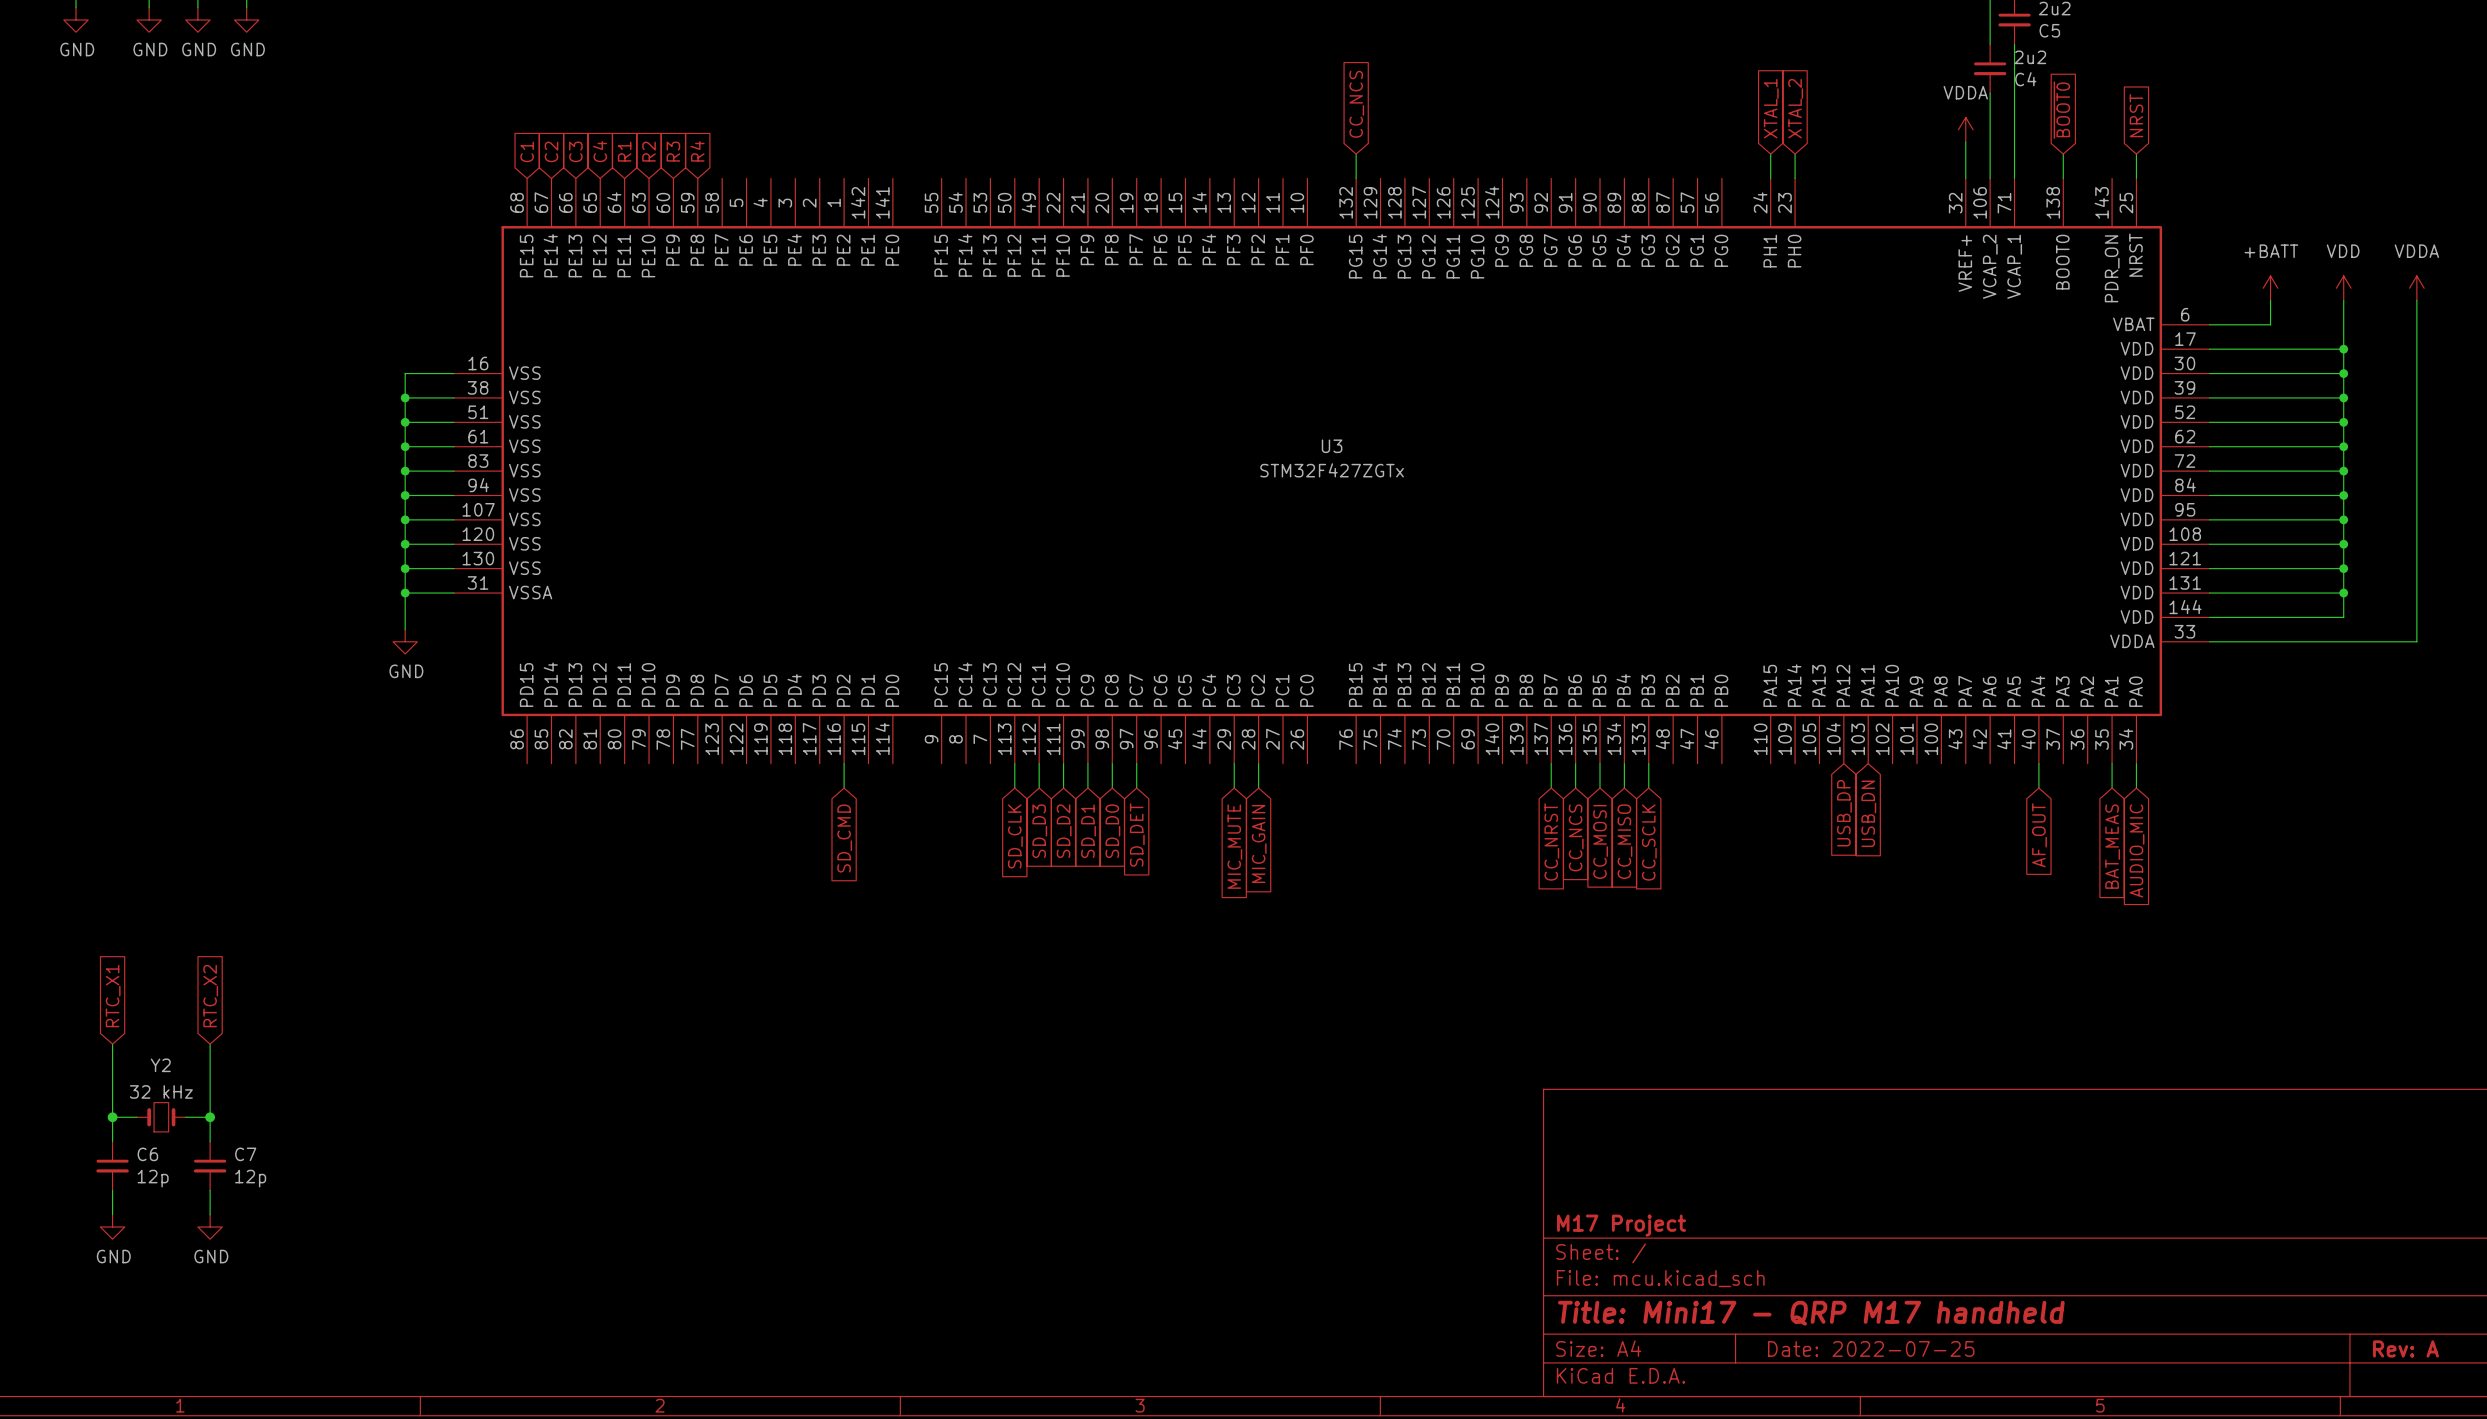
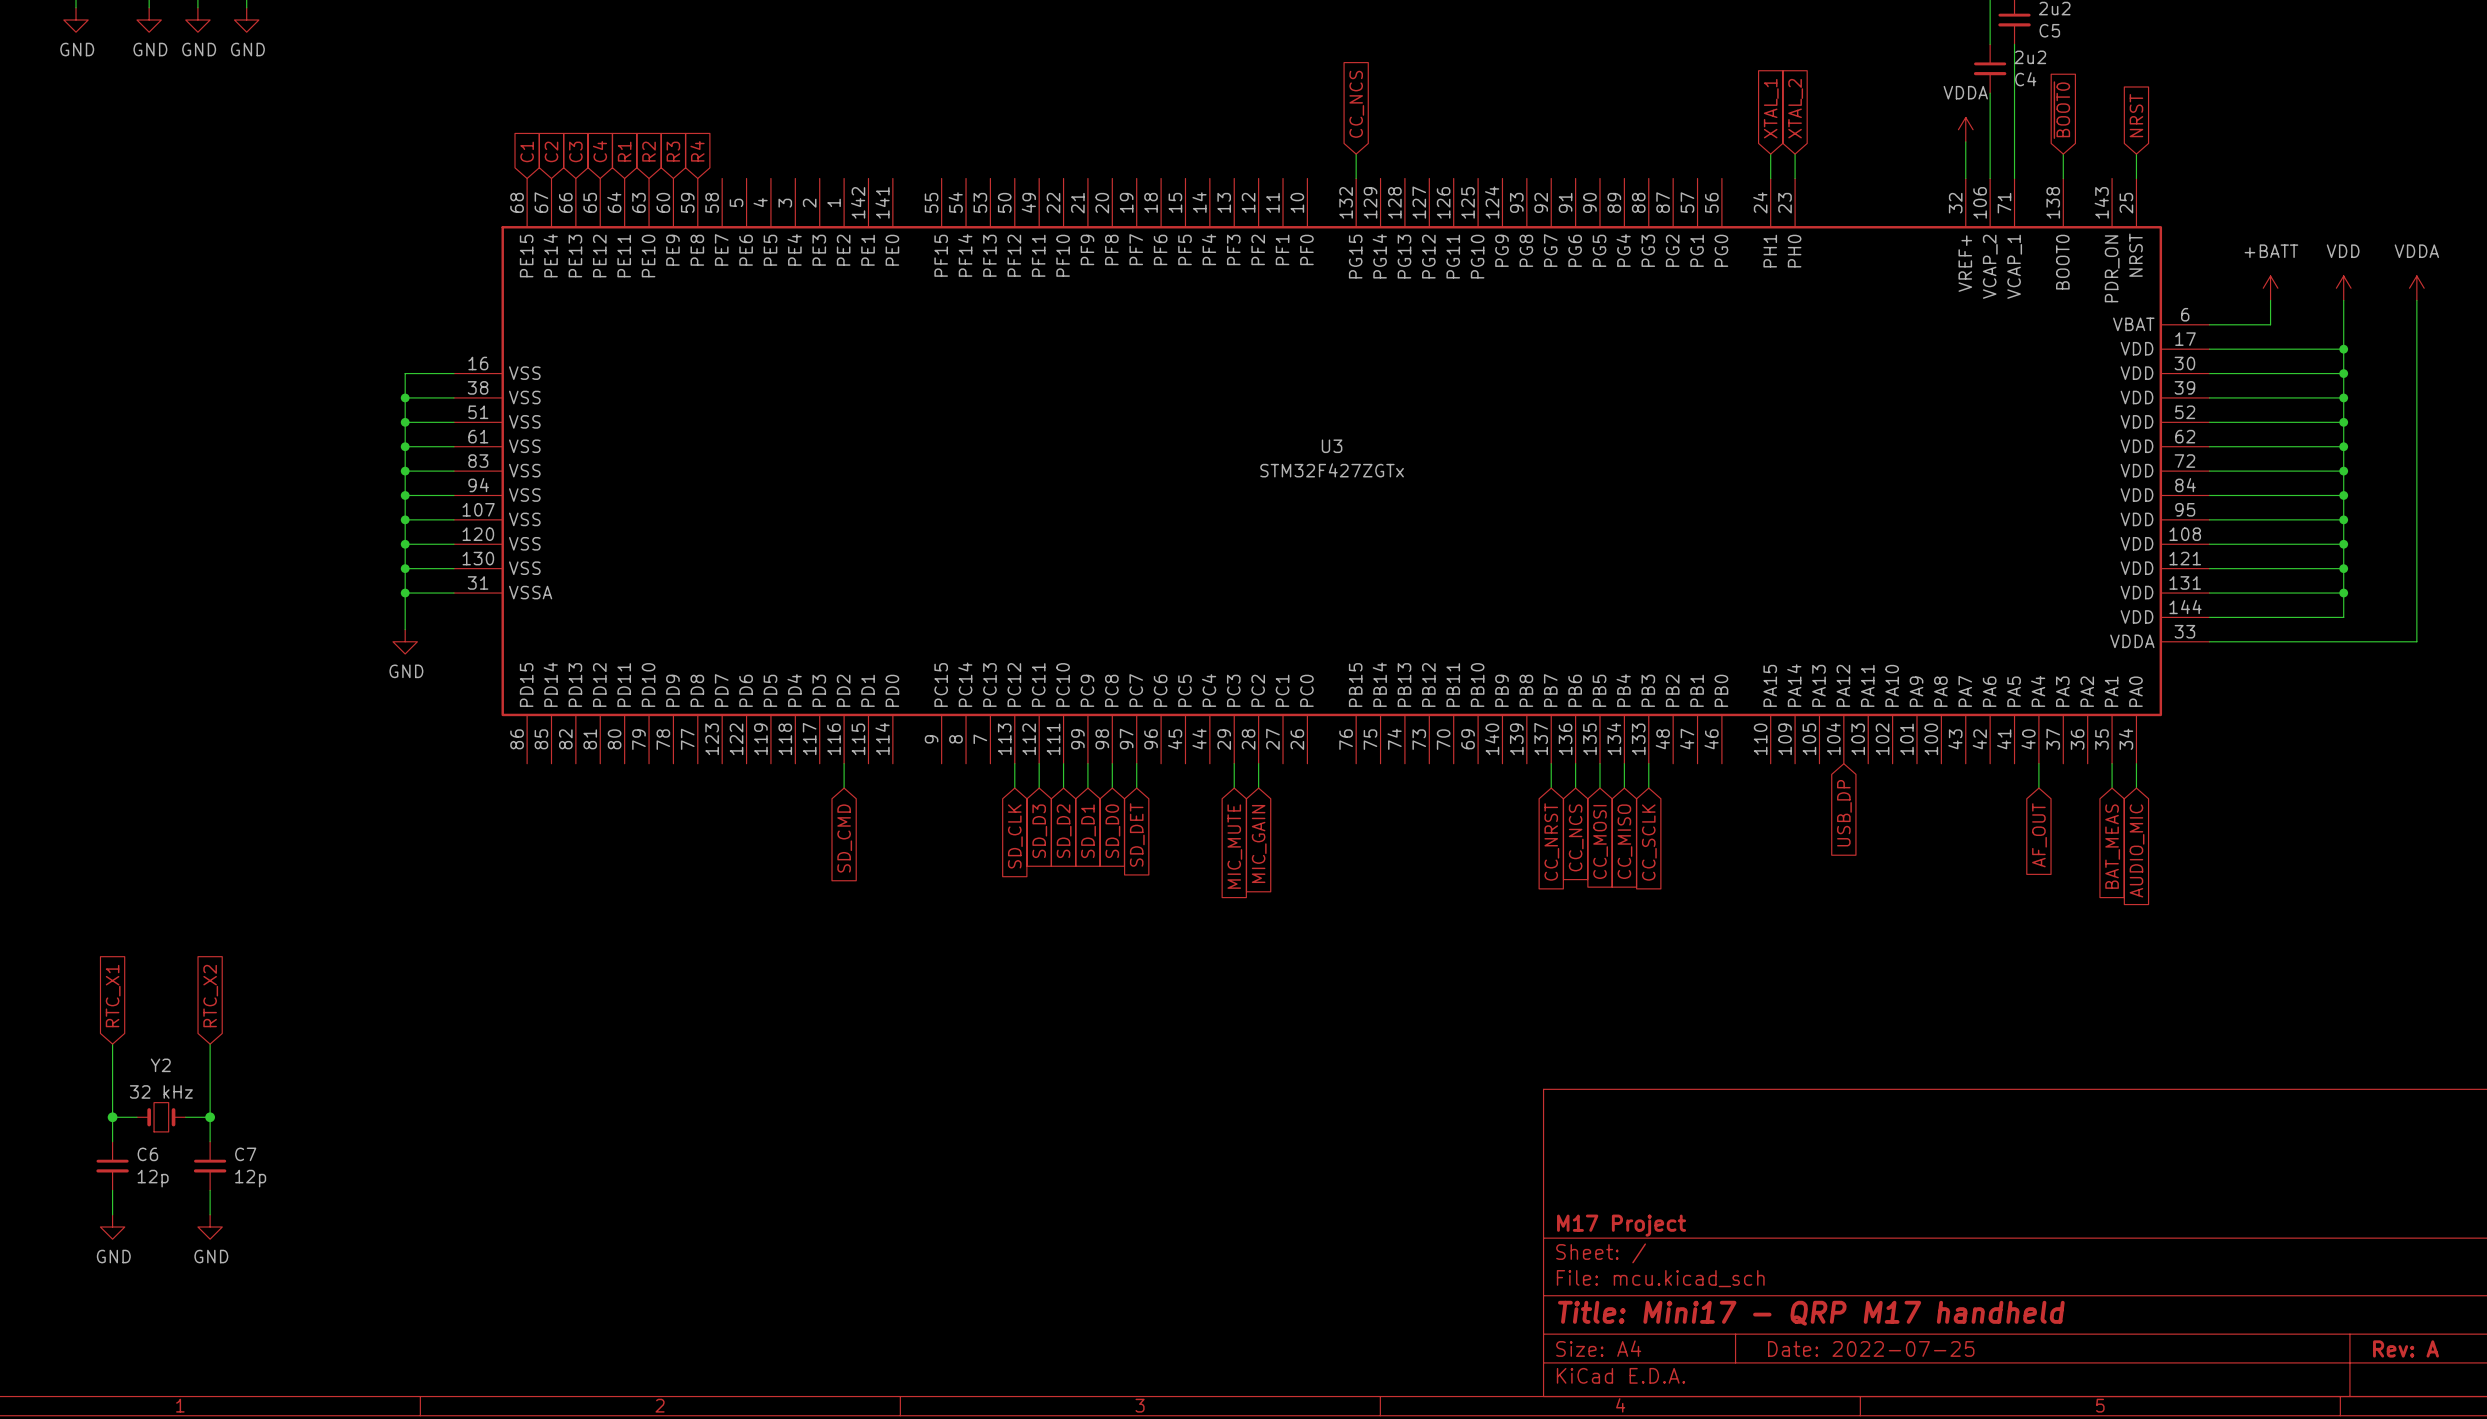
global label: USB_DN (1868, 813) -> none

